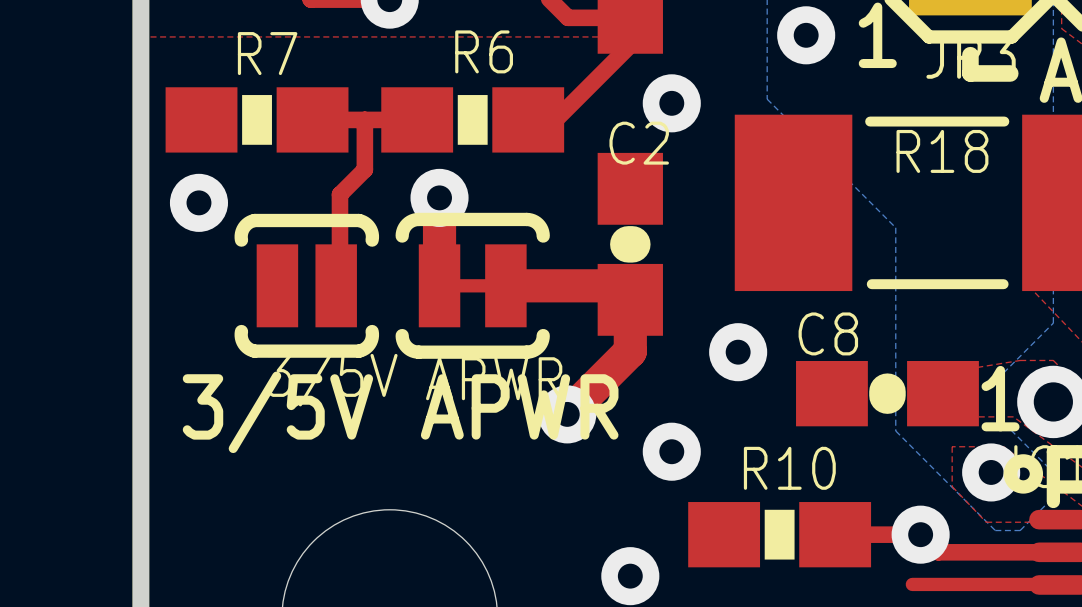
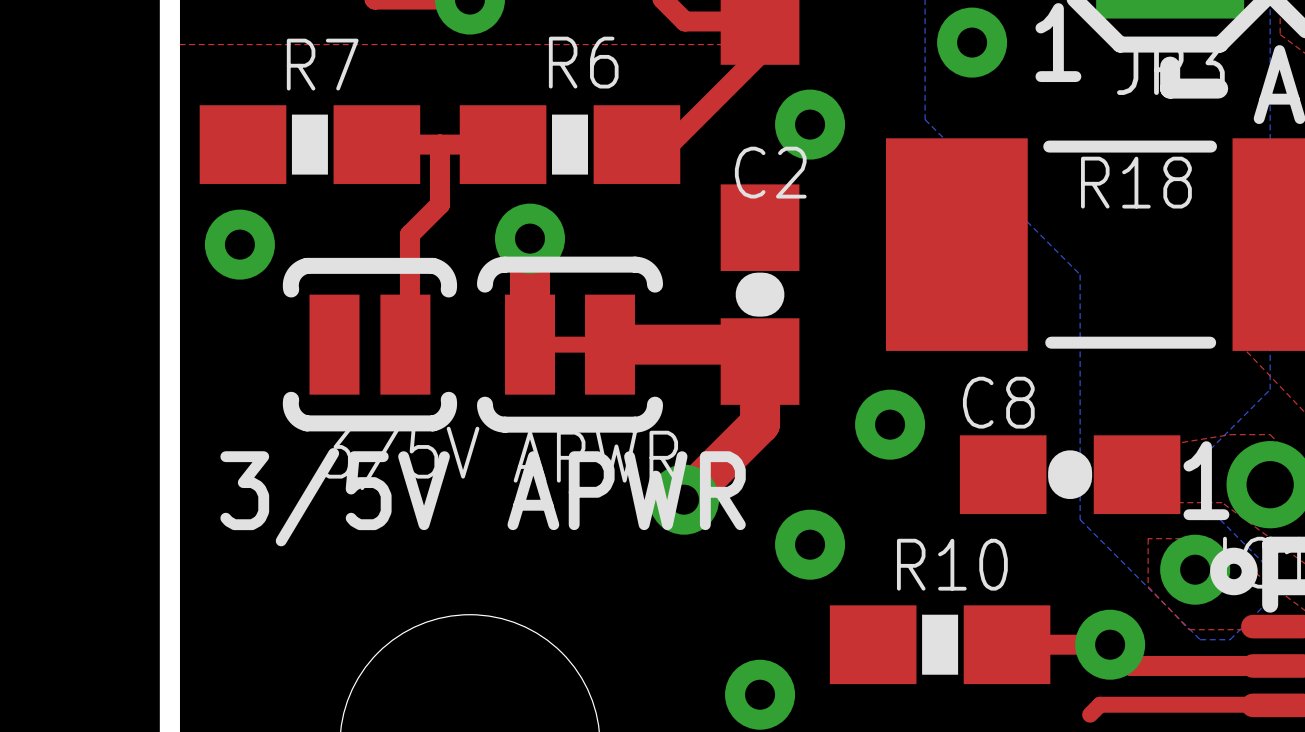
top track: none -> (1100, 704) (1090, 714)

